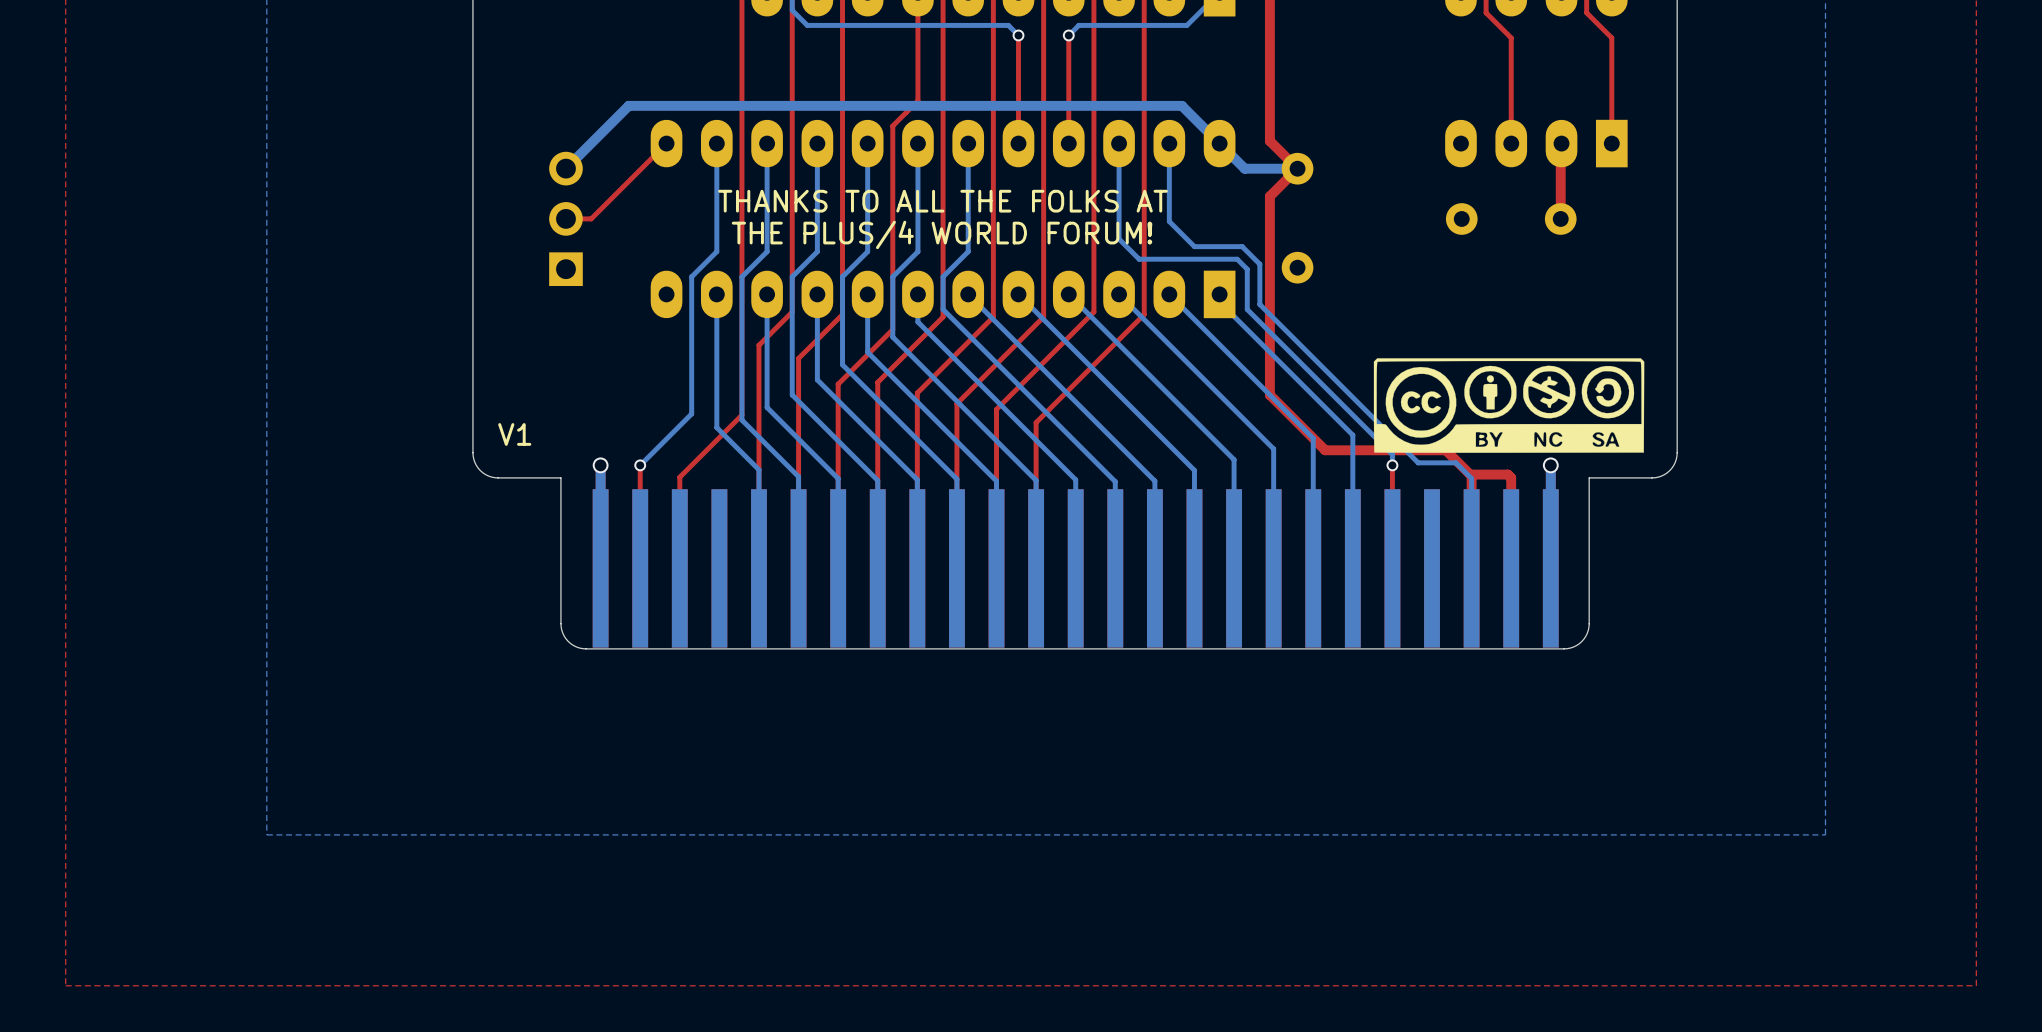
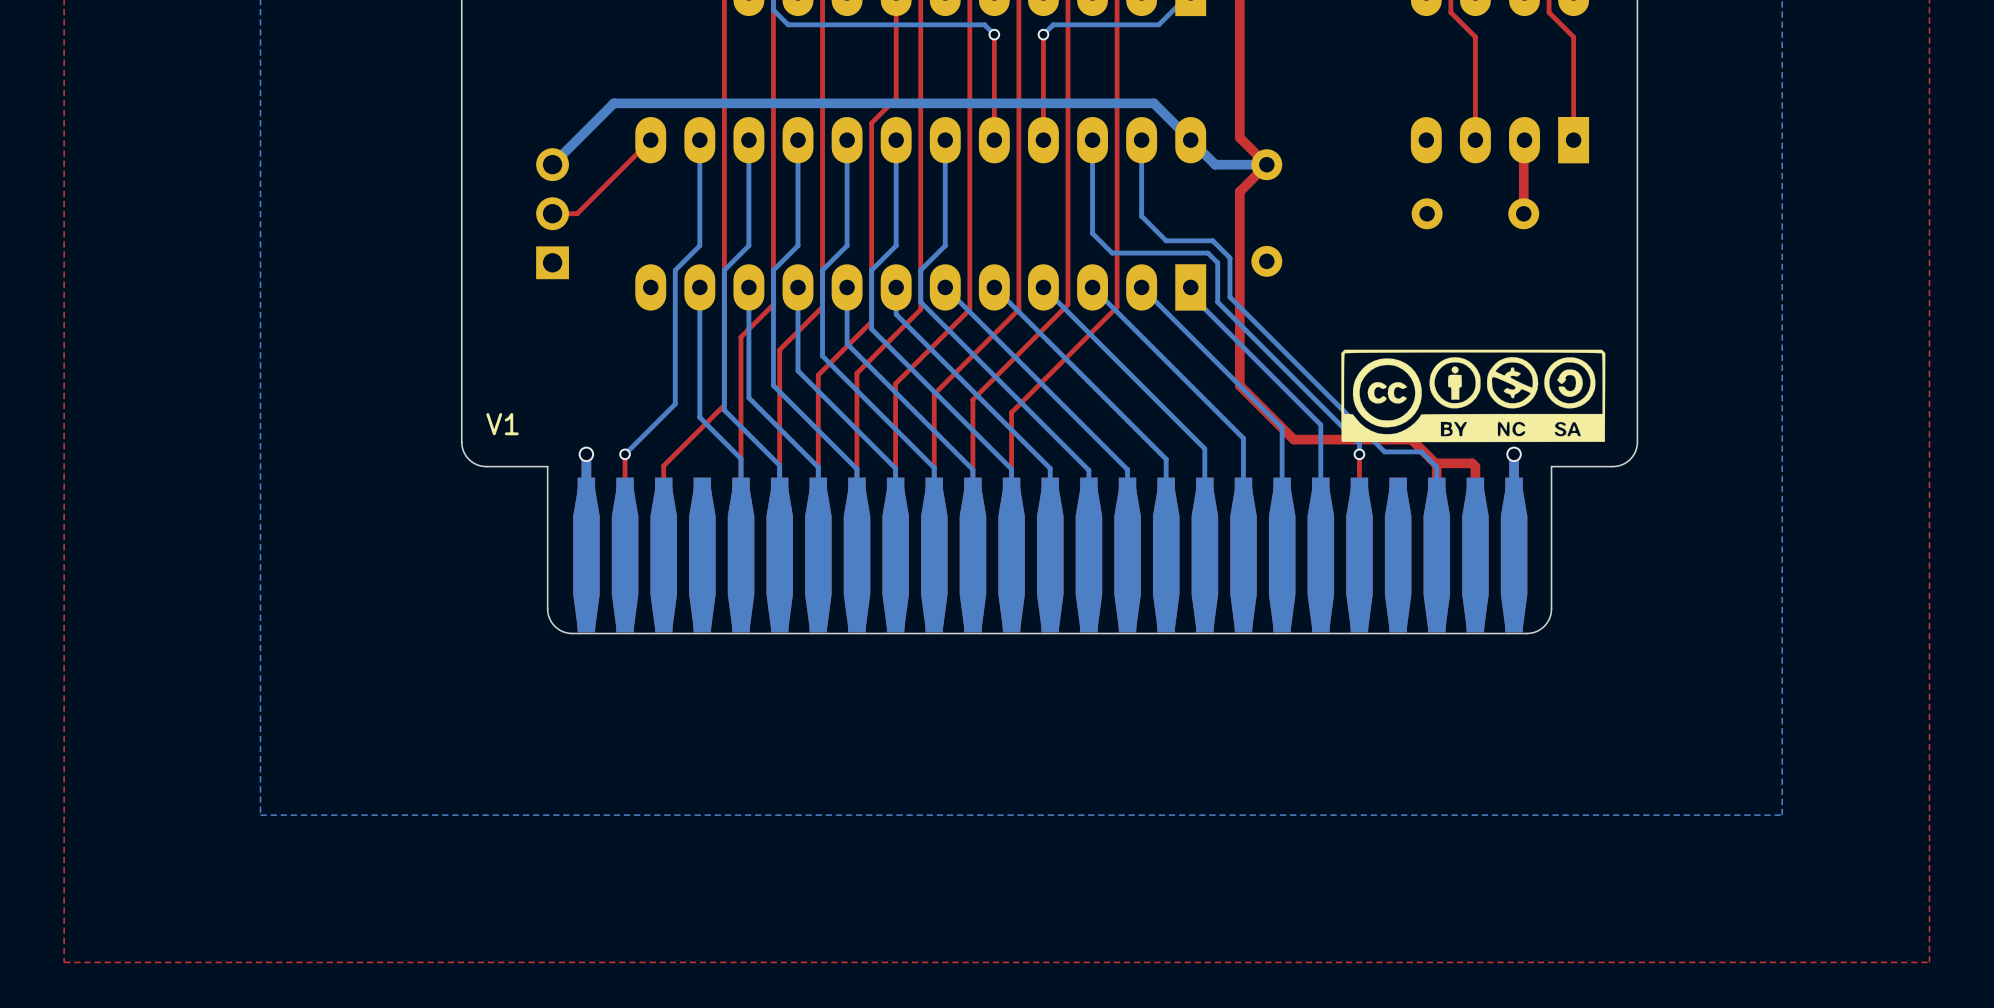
text: THANKS TO ALL THE FOLKS AT (942, 201) -> none
text: THE PLUS/4 WORLD FORUM! (942, 234) -> none
part footprint: [592, 489, 1559, 648] -> [573, 477, 1528, 633]

